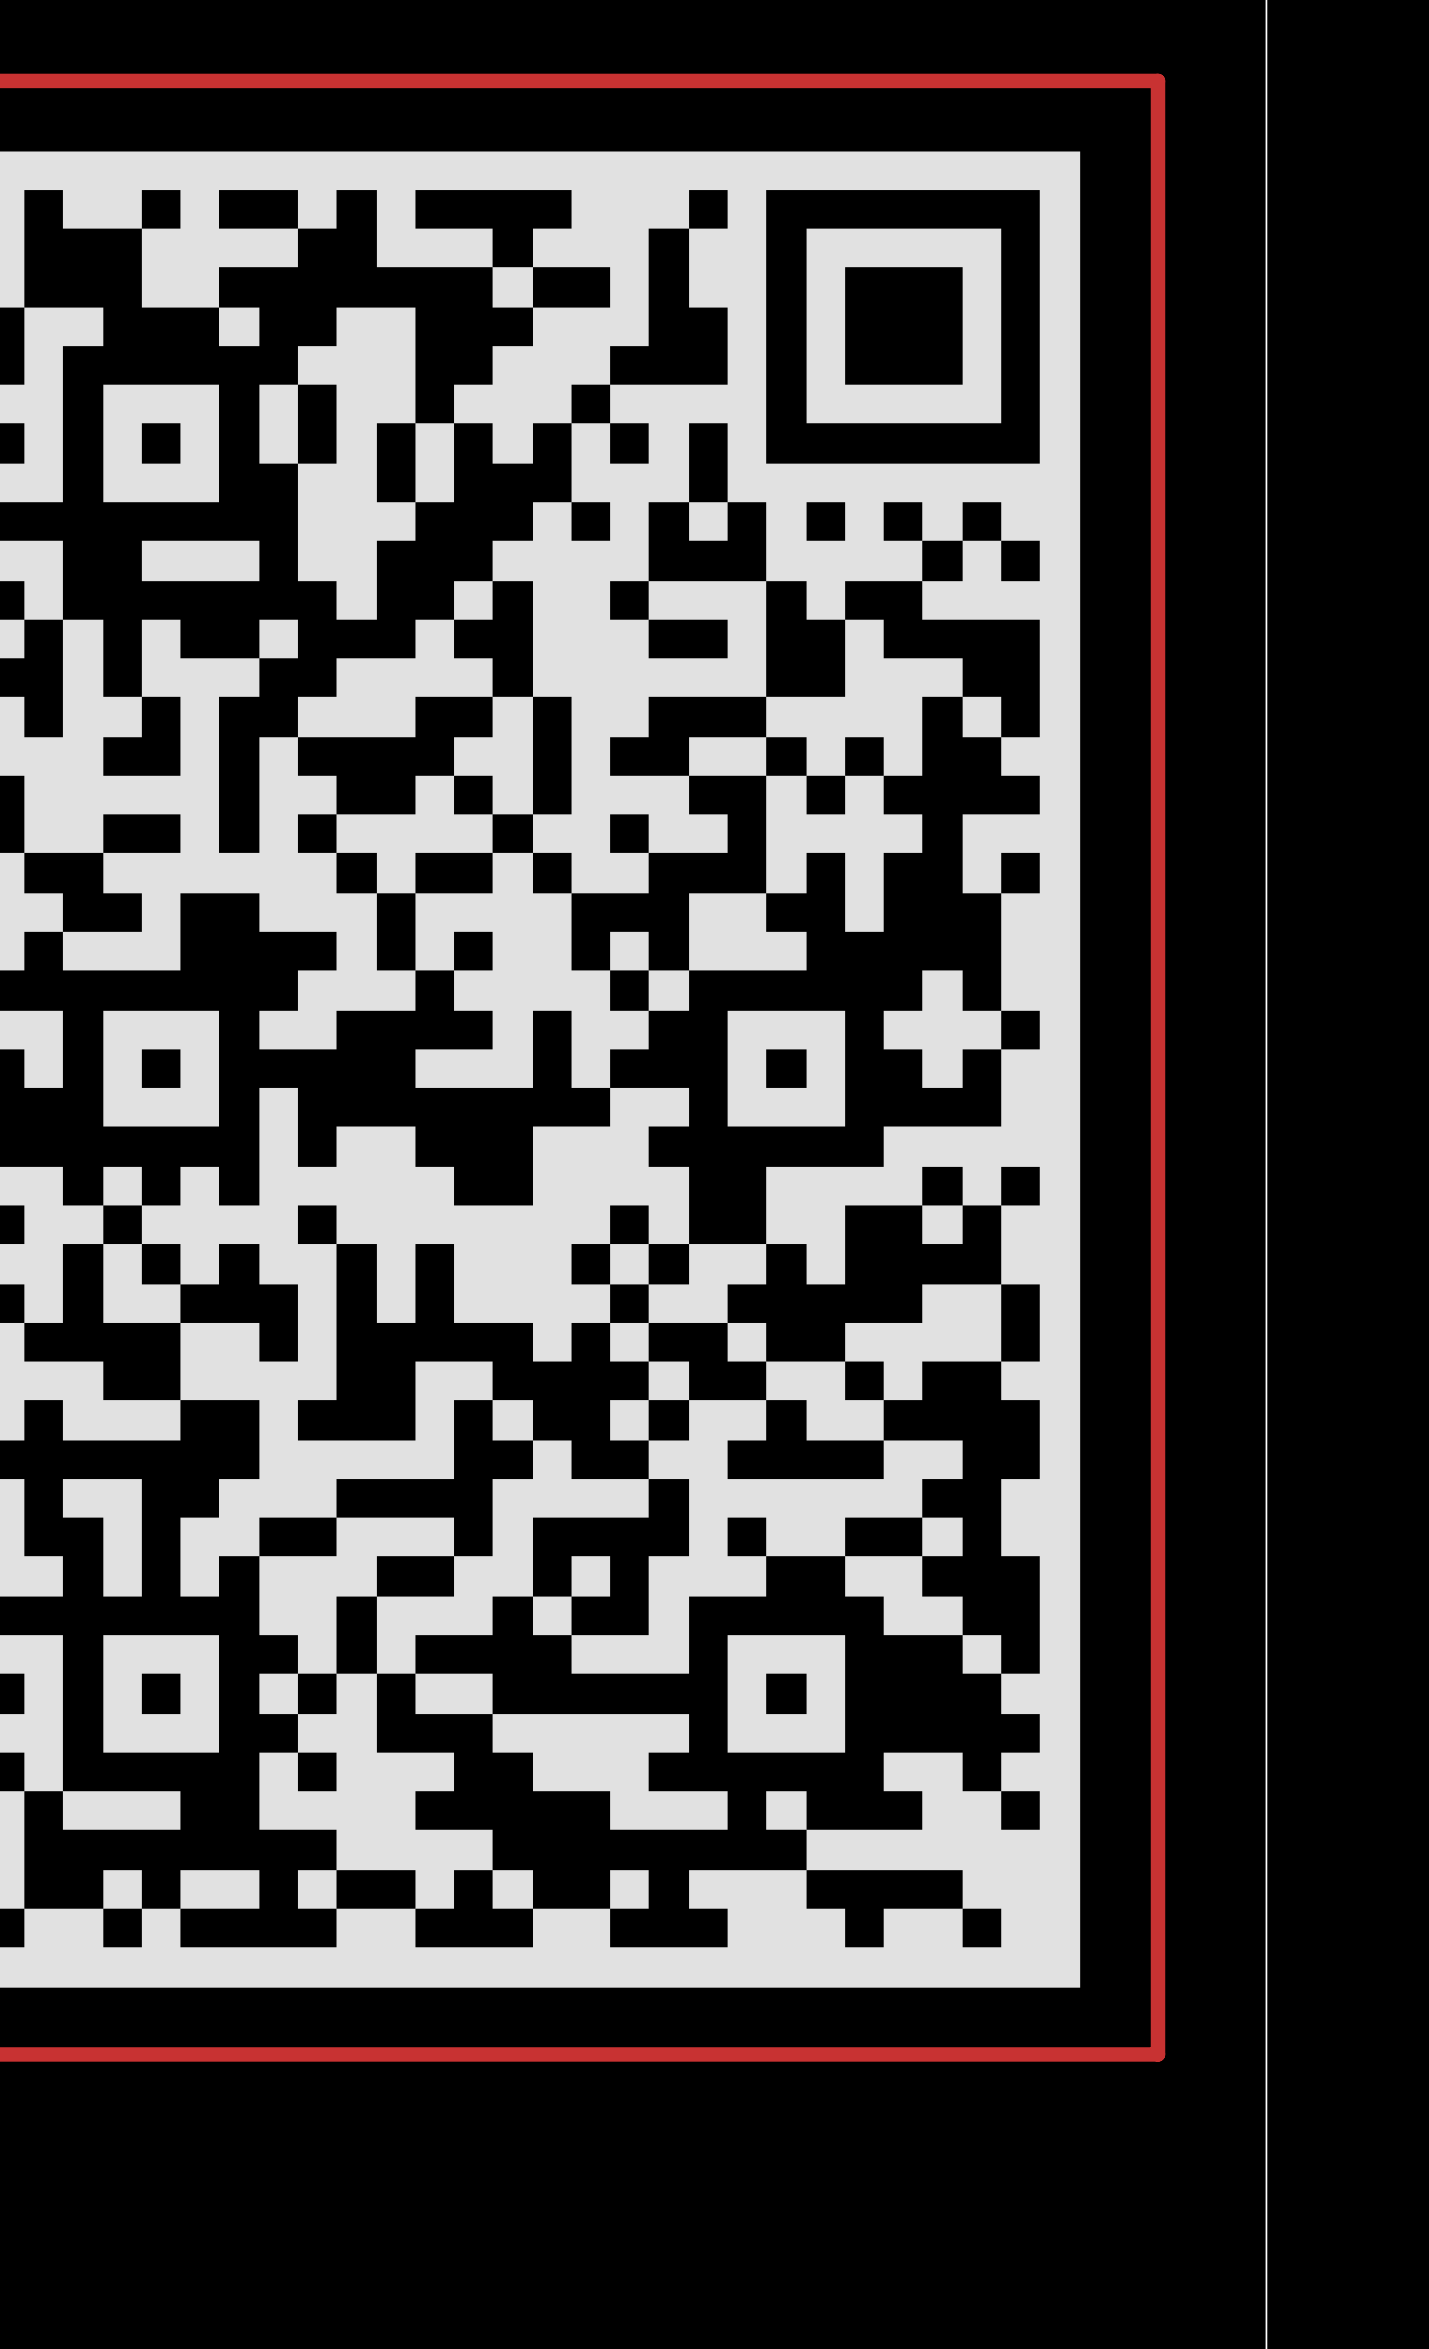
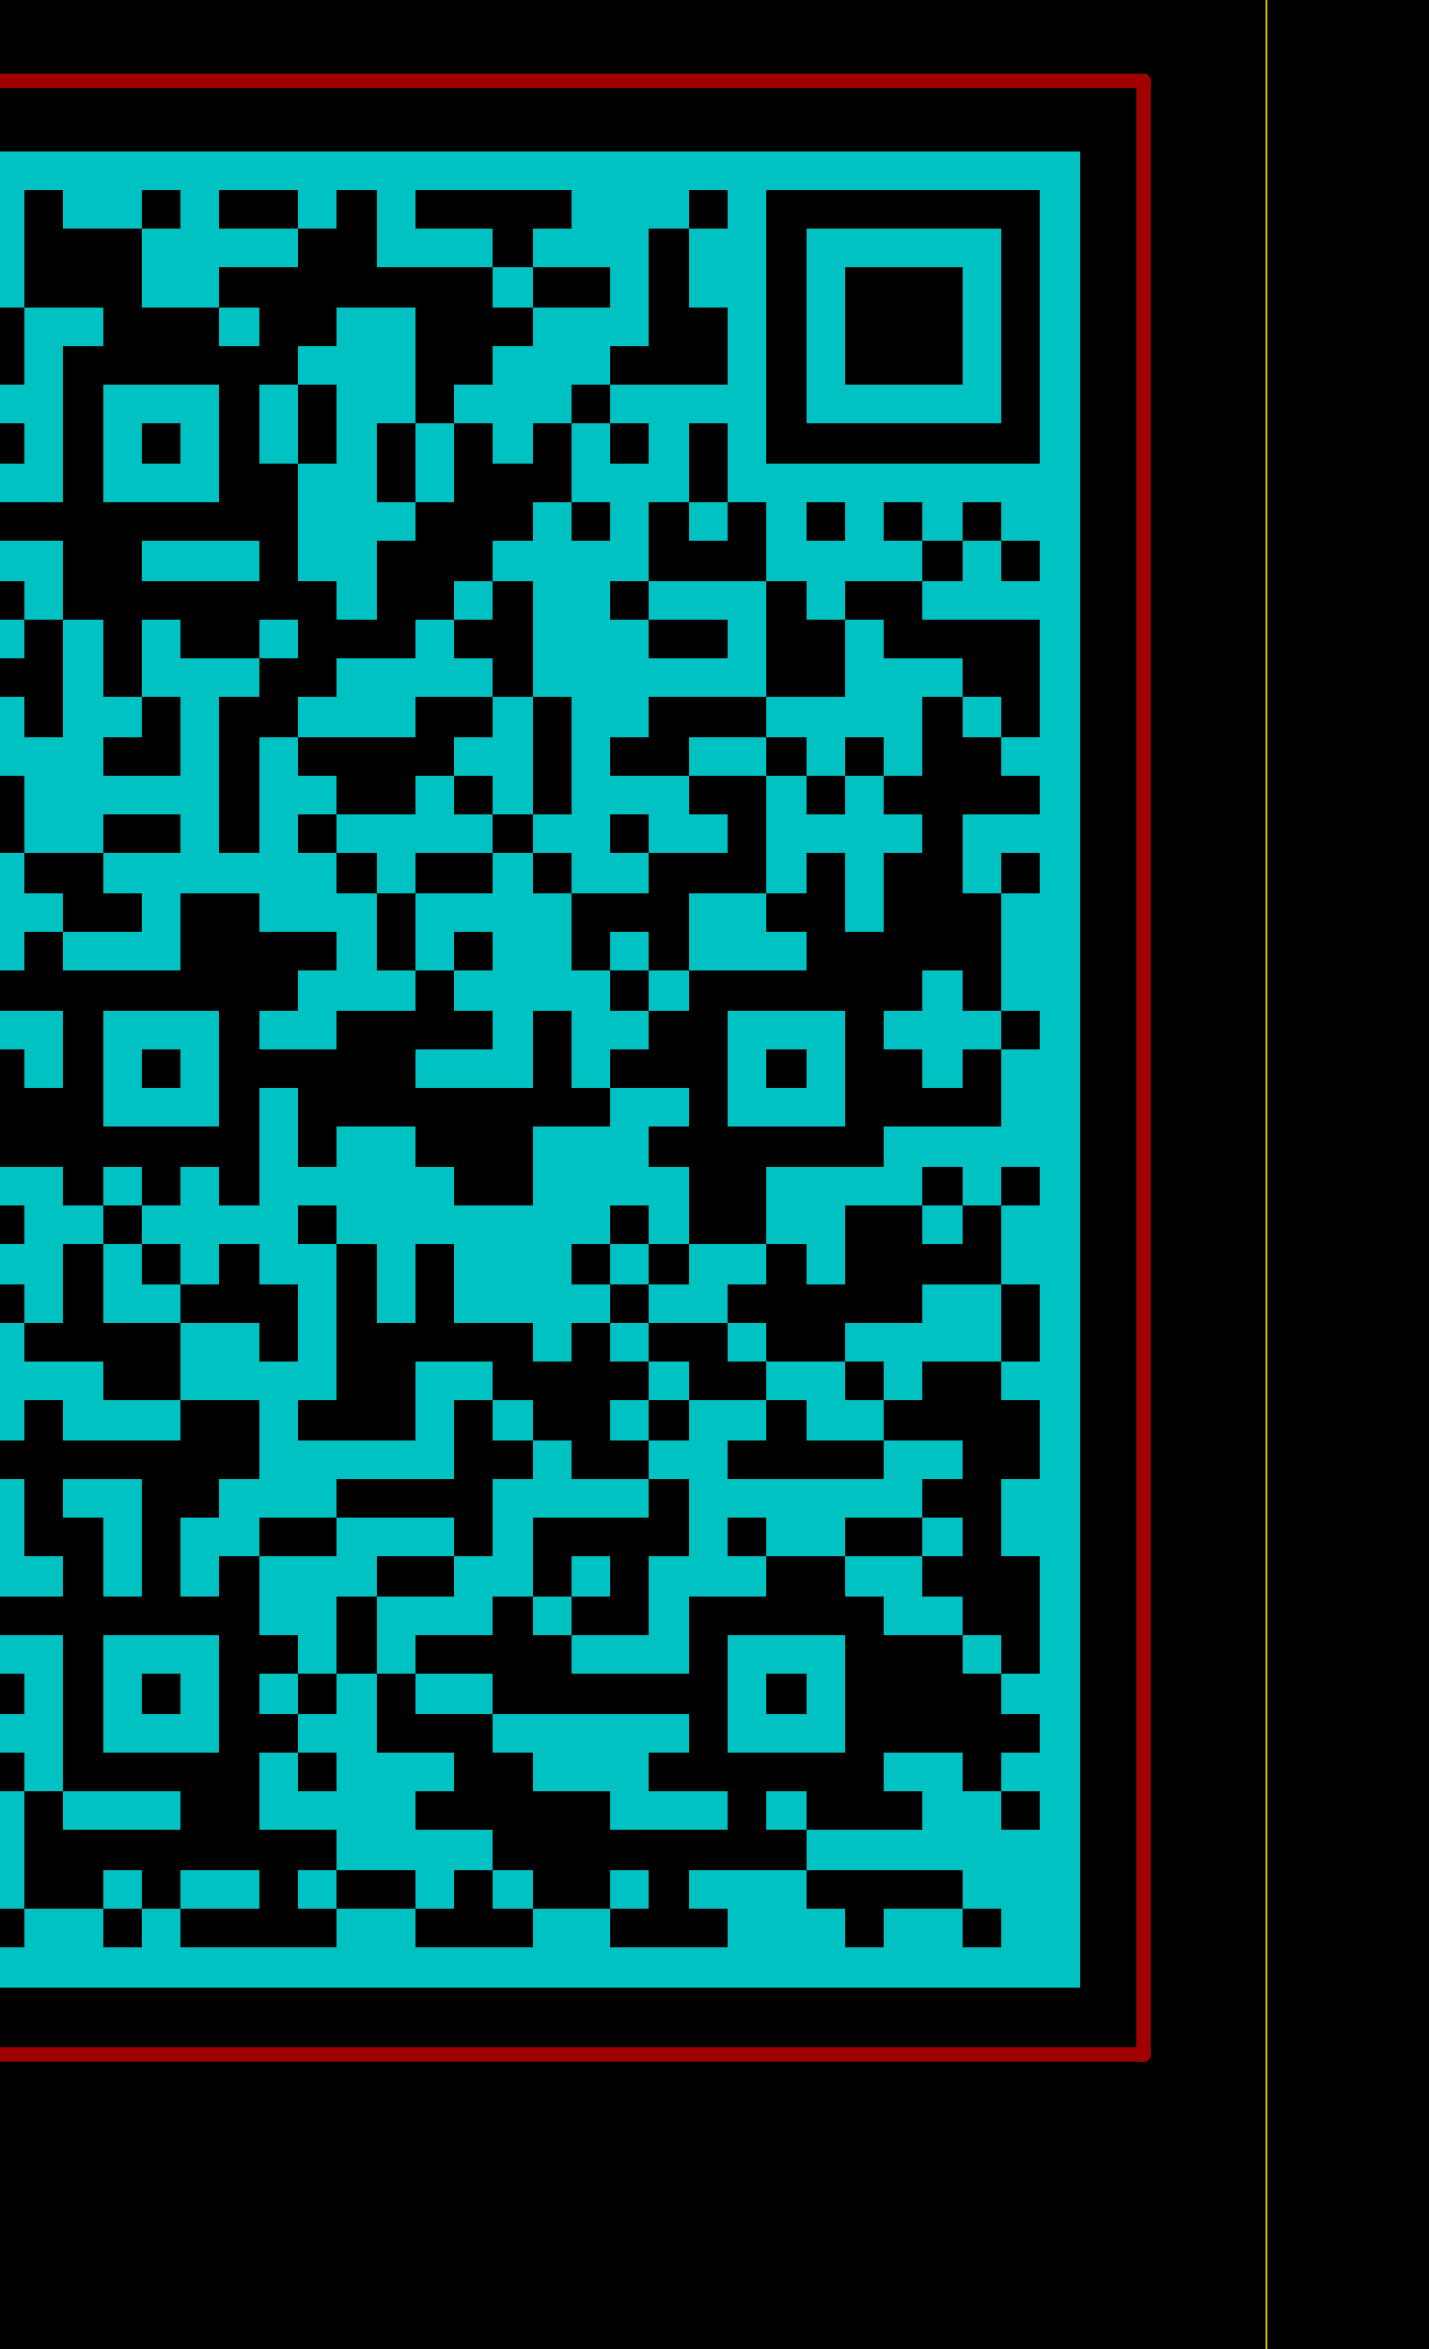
track: (1143, 80) (1158, 80) (1158, 2054) (1143, 2054) -> (1143, 80) (1143, 2054)

